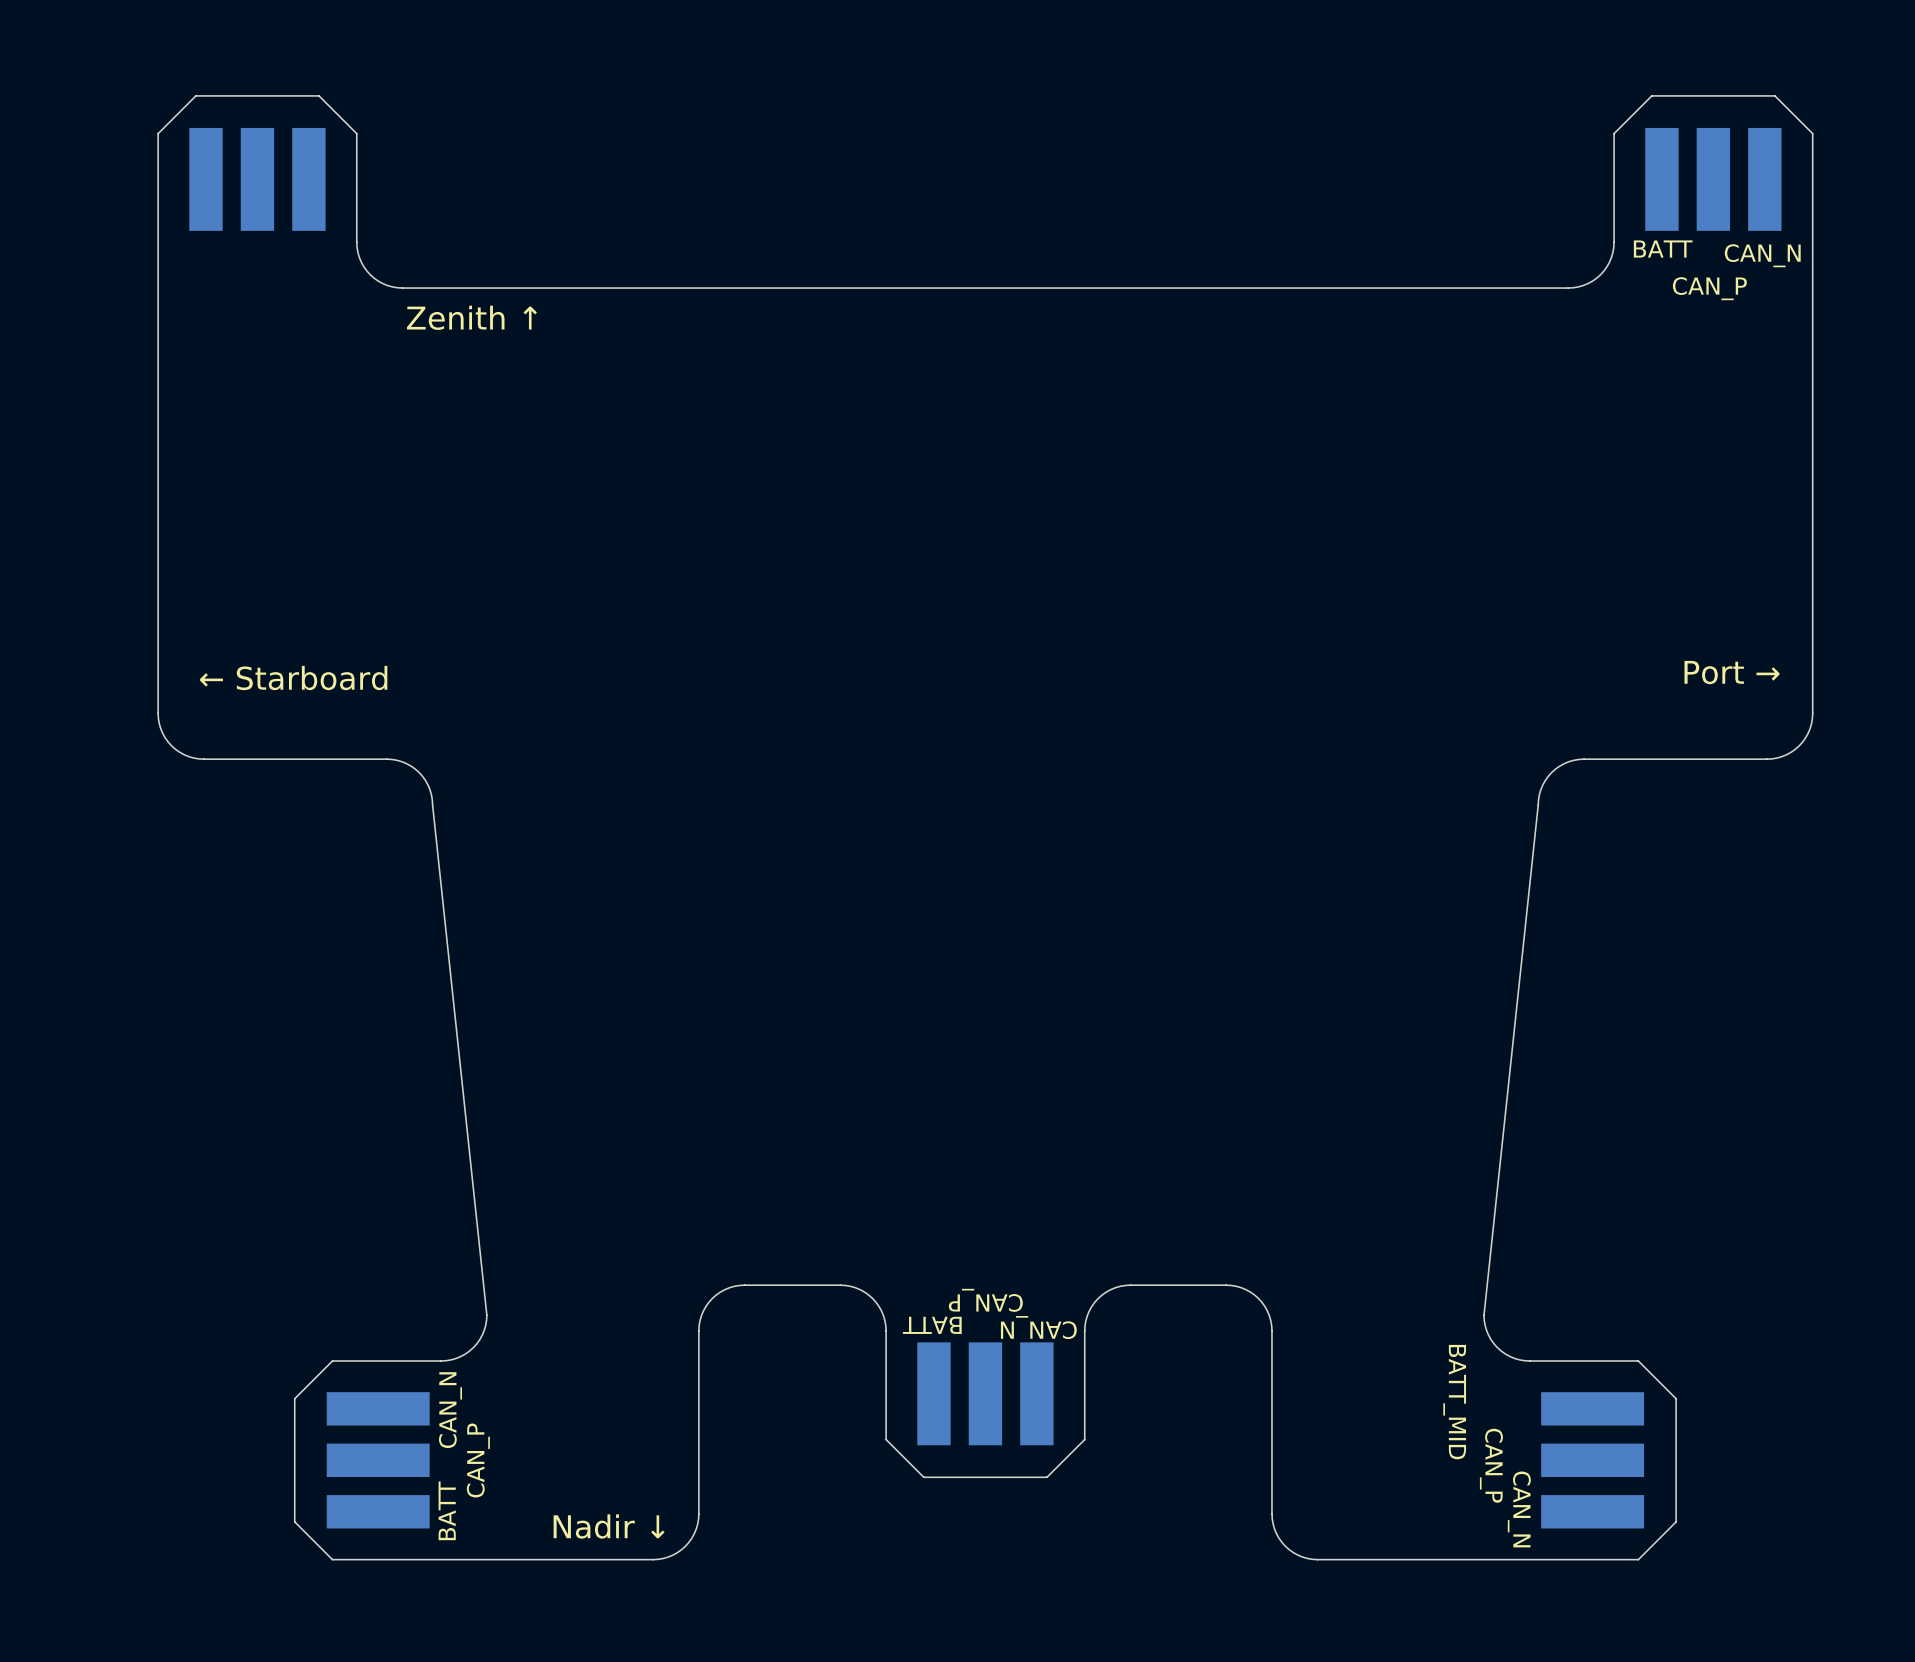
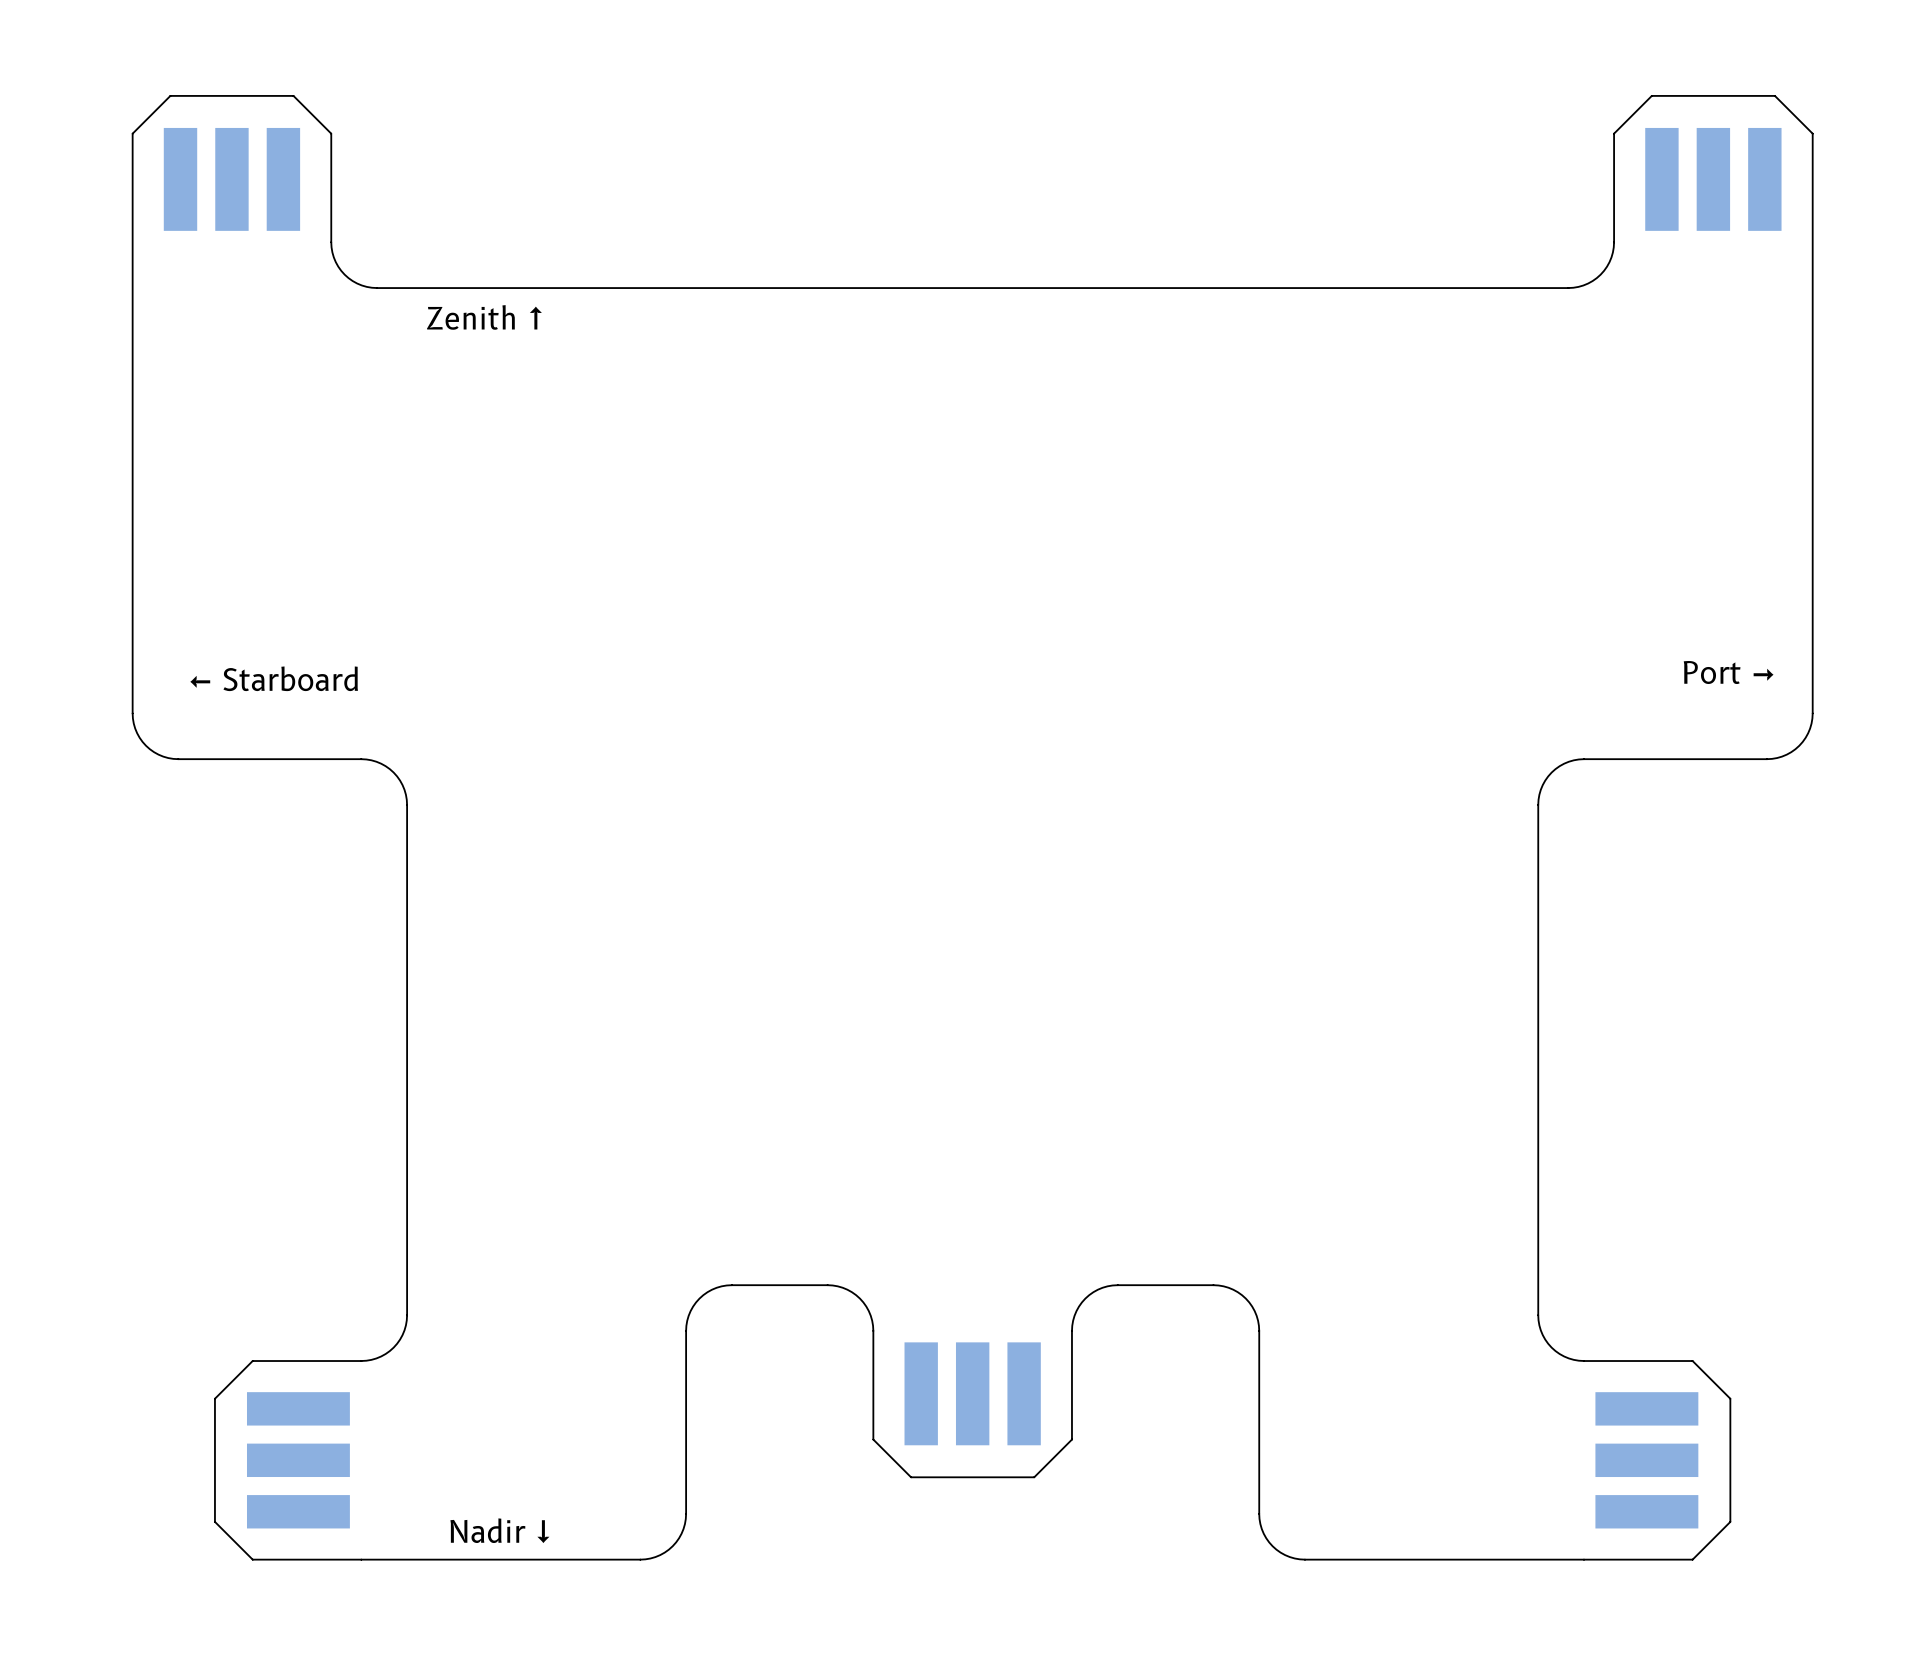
part footprint: [157, 95, 1814, 1561] -> [132, 95, 1814, 1561]
text: BATT (1663, 249) -> none
text: CAN_N (1762, 255) -> none
text: CAN_P (1709, 288) -> none
text: CAN_P (985, 1300) -> none
text: BATT (932, 1325) -> none
text: CAN_N (1038, 1327) -> none
text: BATT_MID (1454, 1402) -> none
text: CAN_N (450, 1410) -> none
text: CAN_P (478, 1460) -> none
text: CAN_P (1491, 1465) -> none
text: CAN_N (1519, 1509) -> none
text: BATT (447, 1510) -> none

